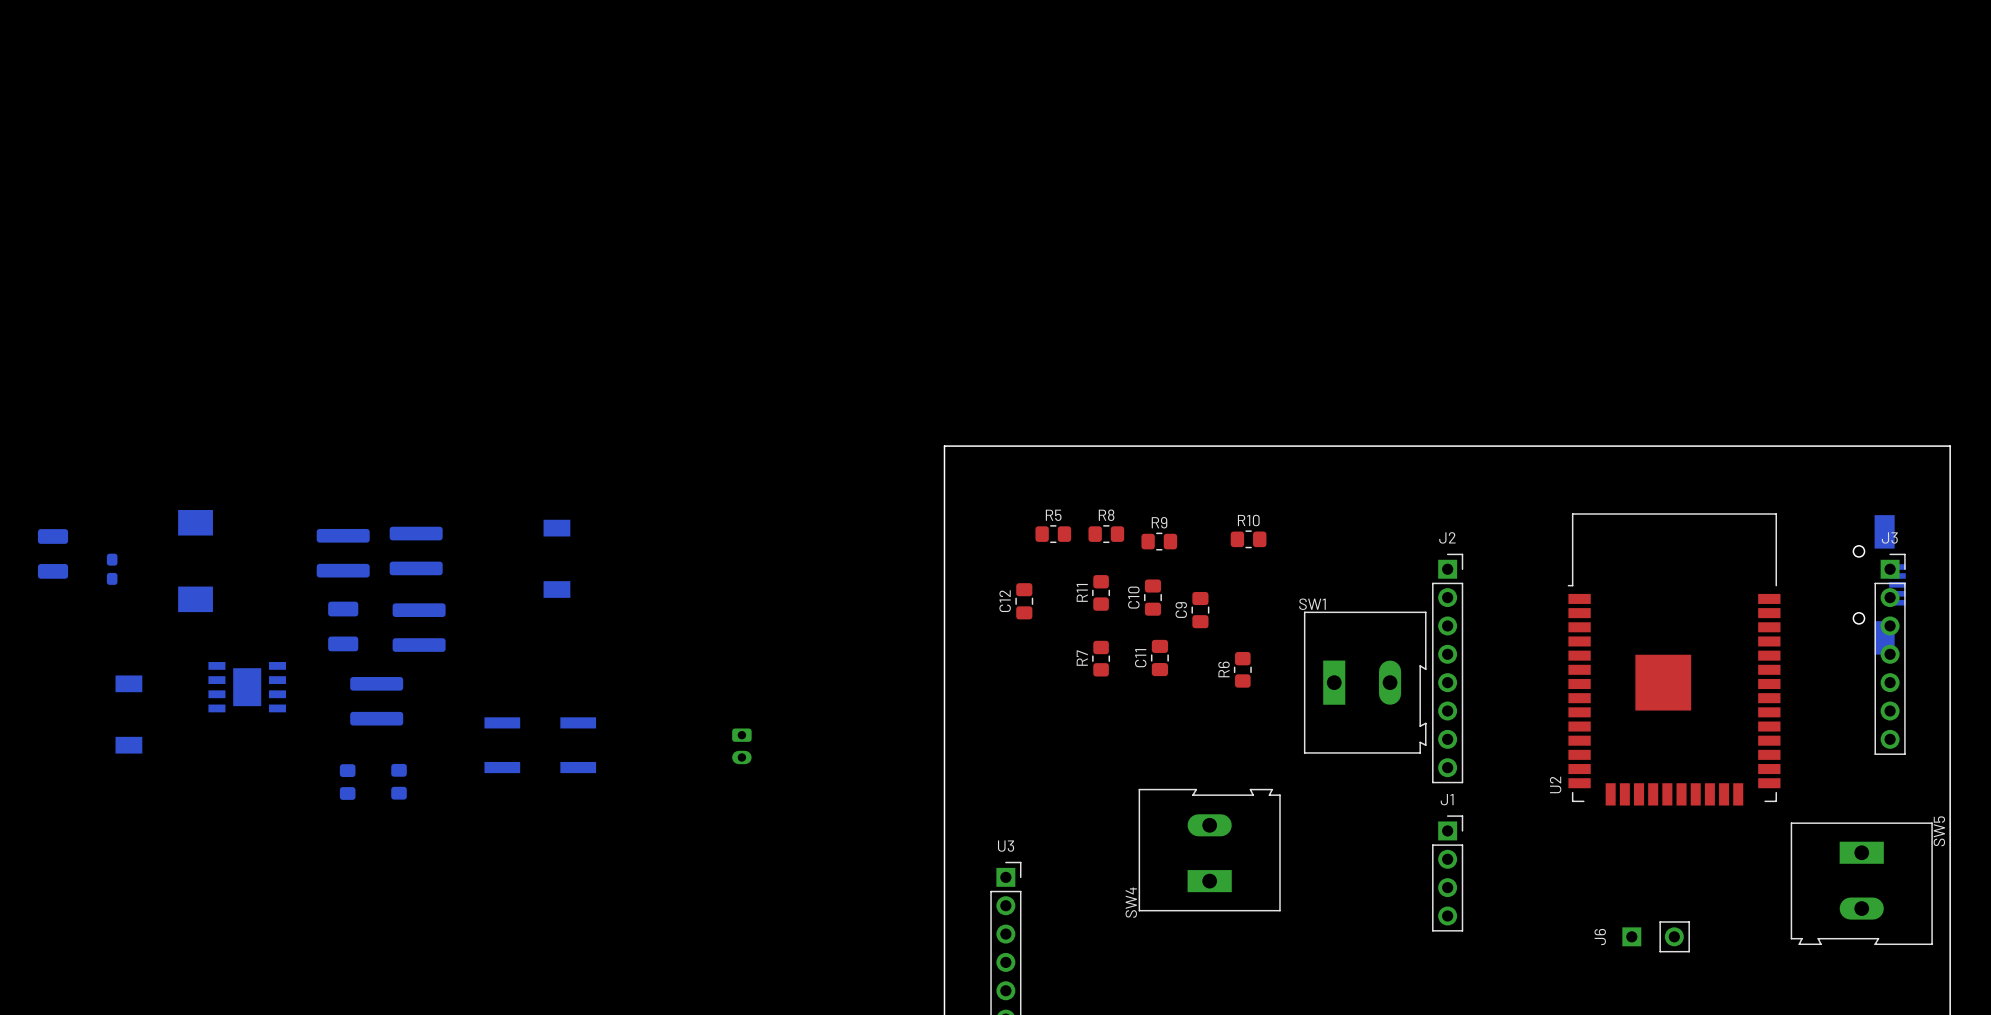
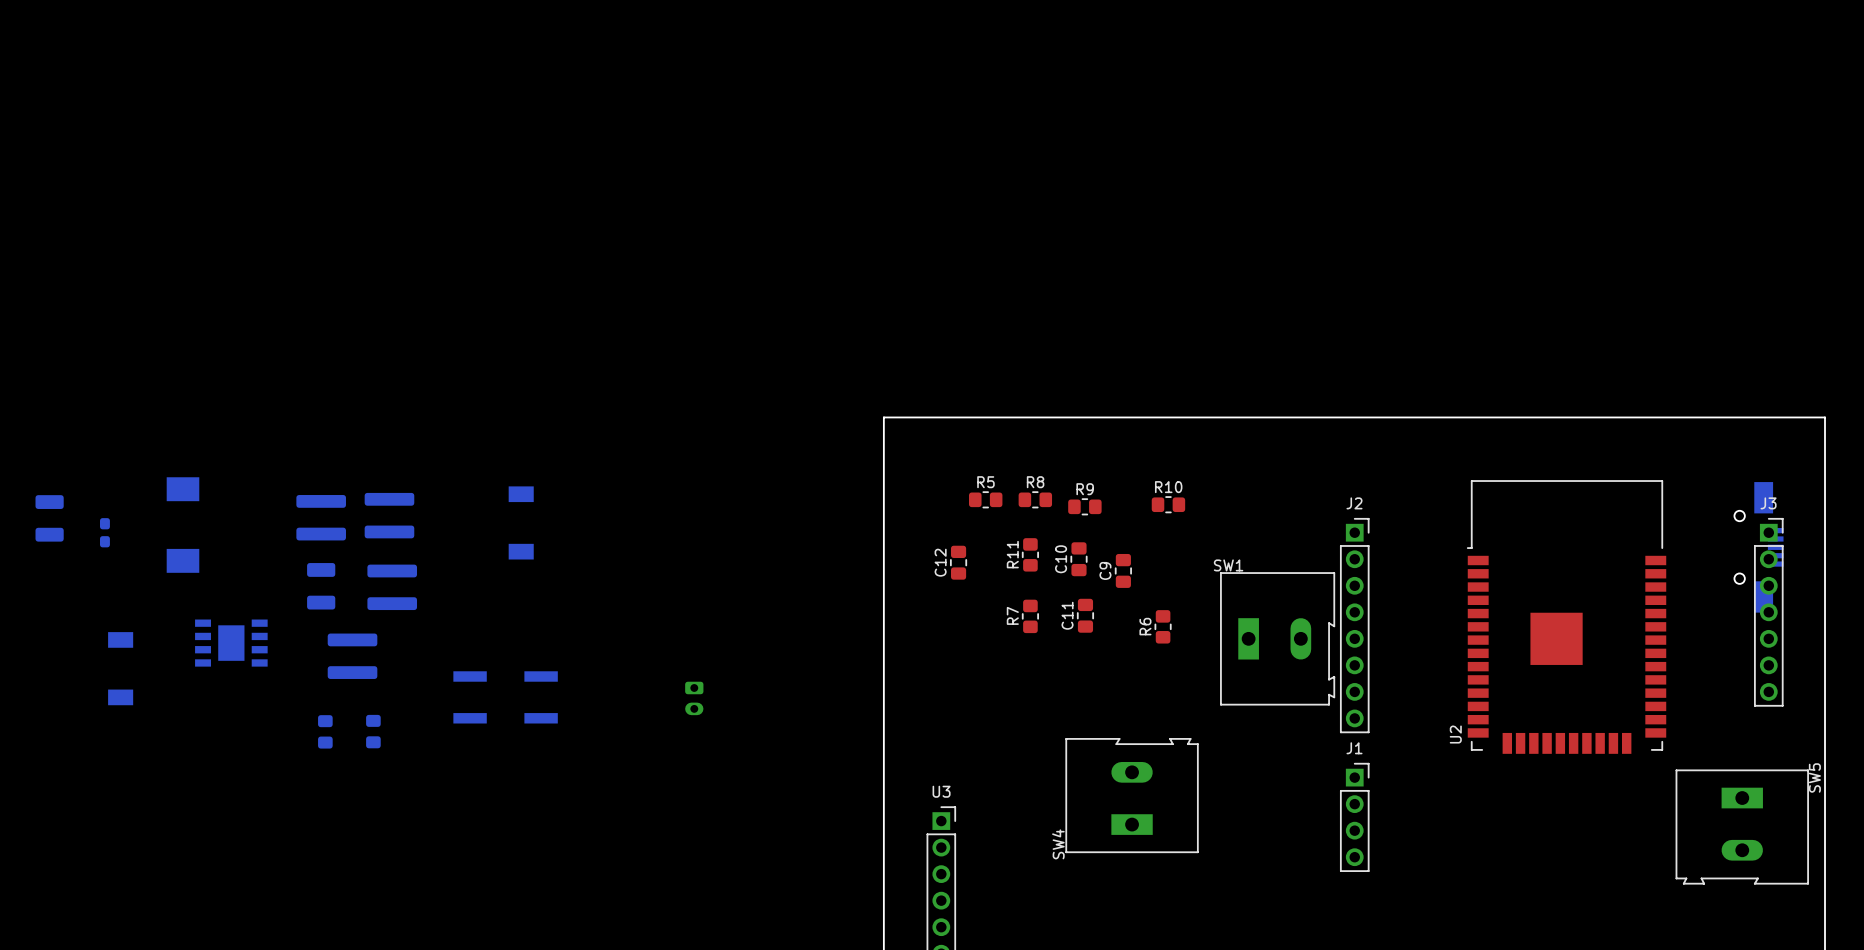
J6: (1656, 936) -> none

